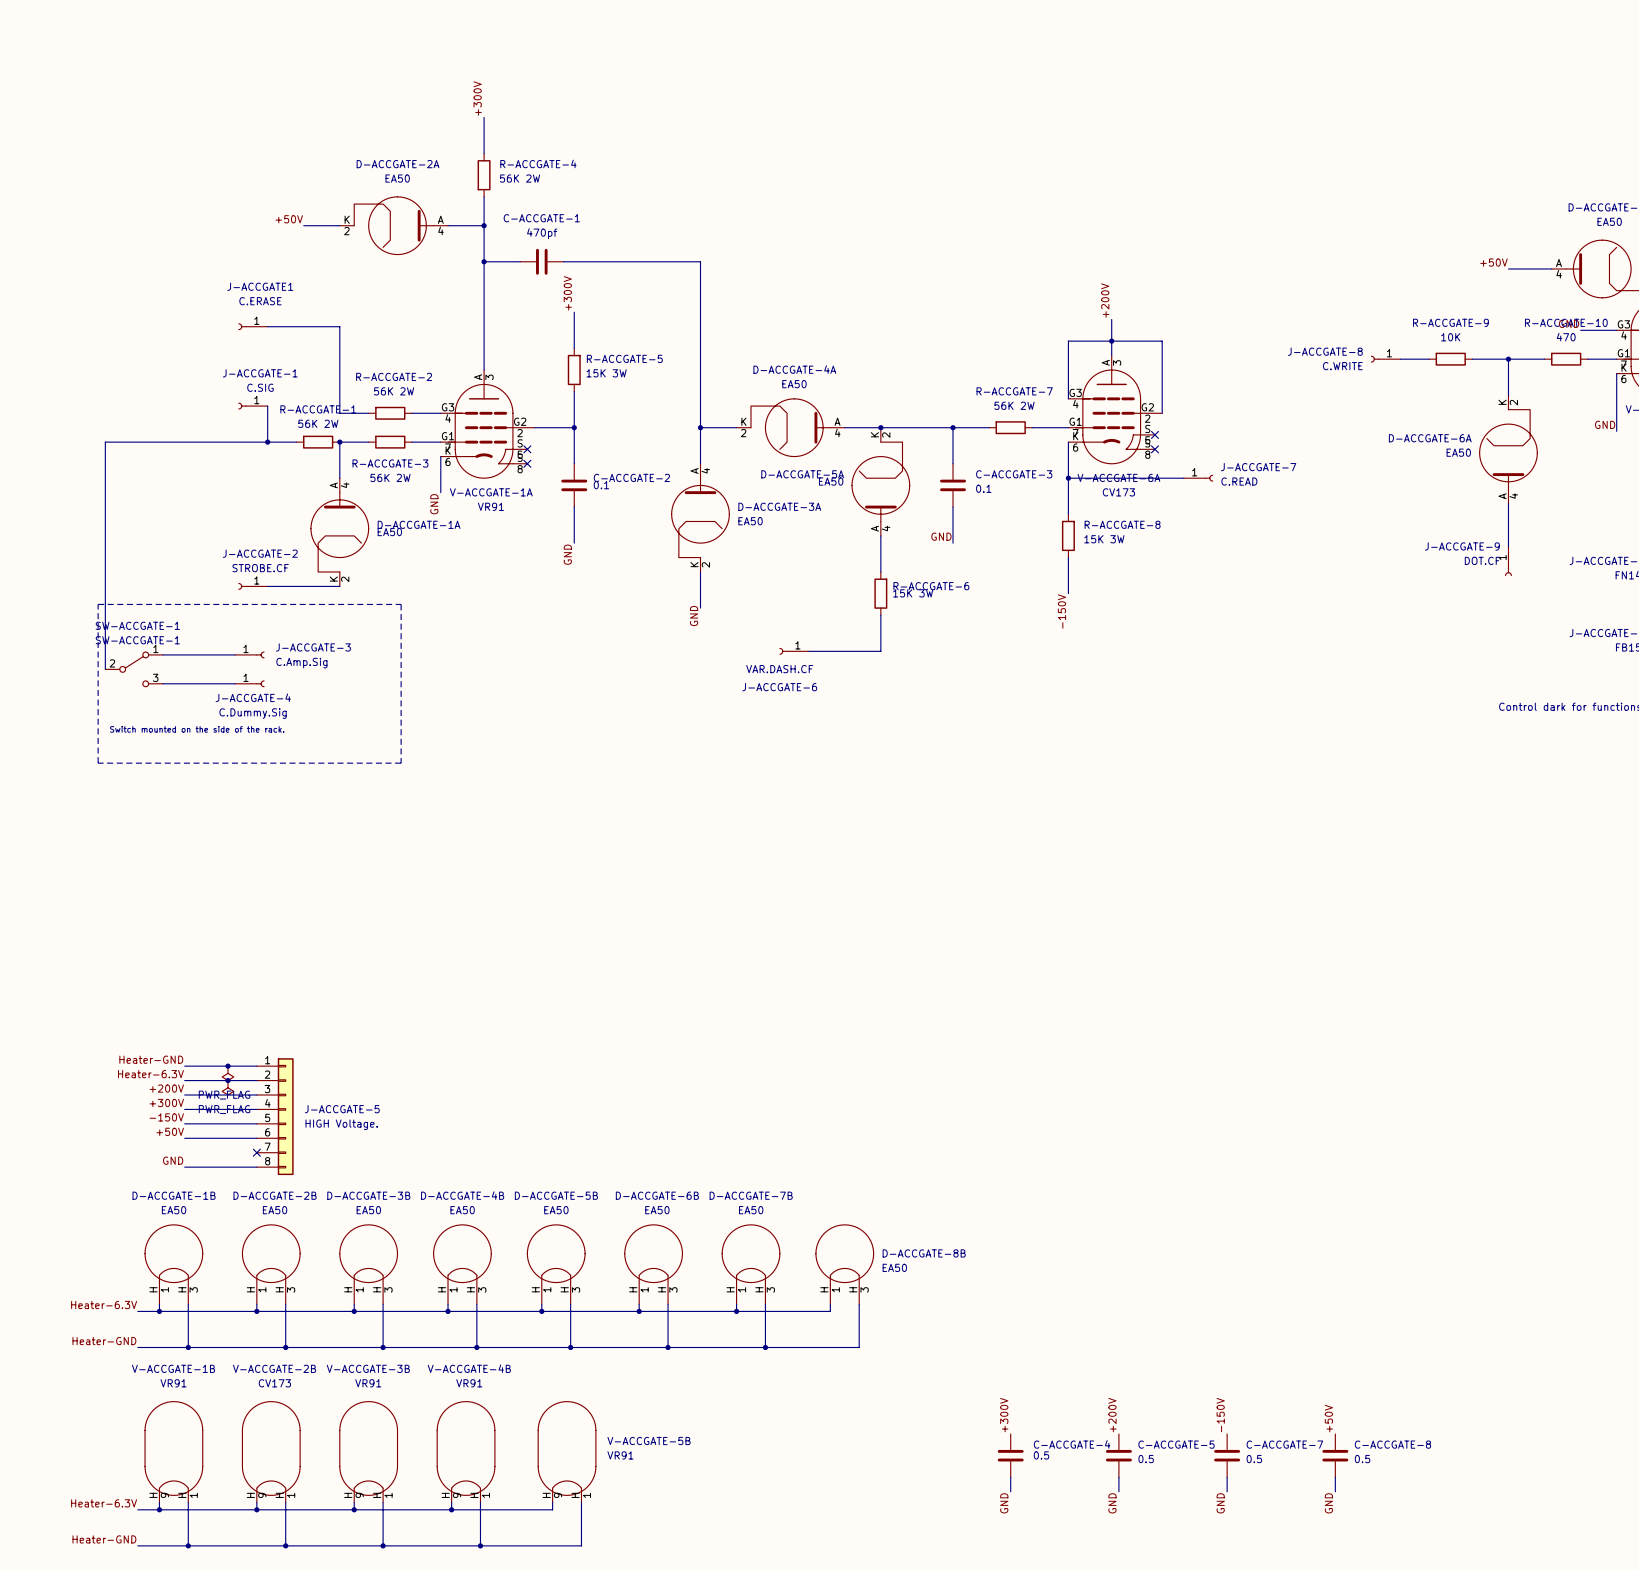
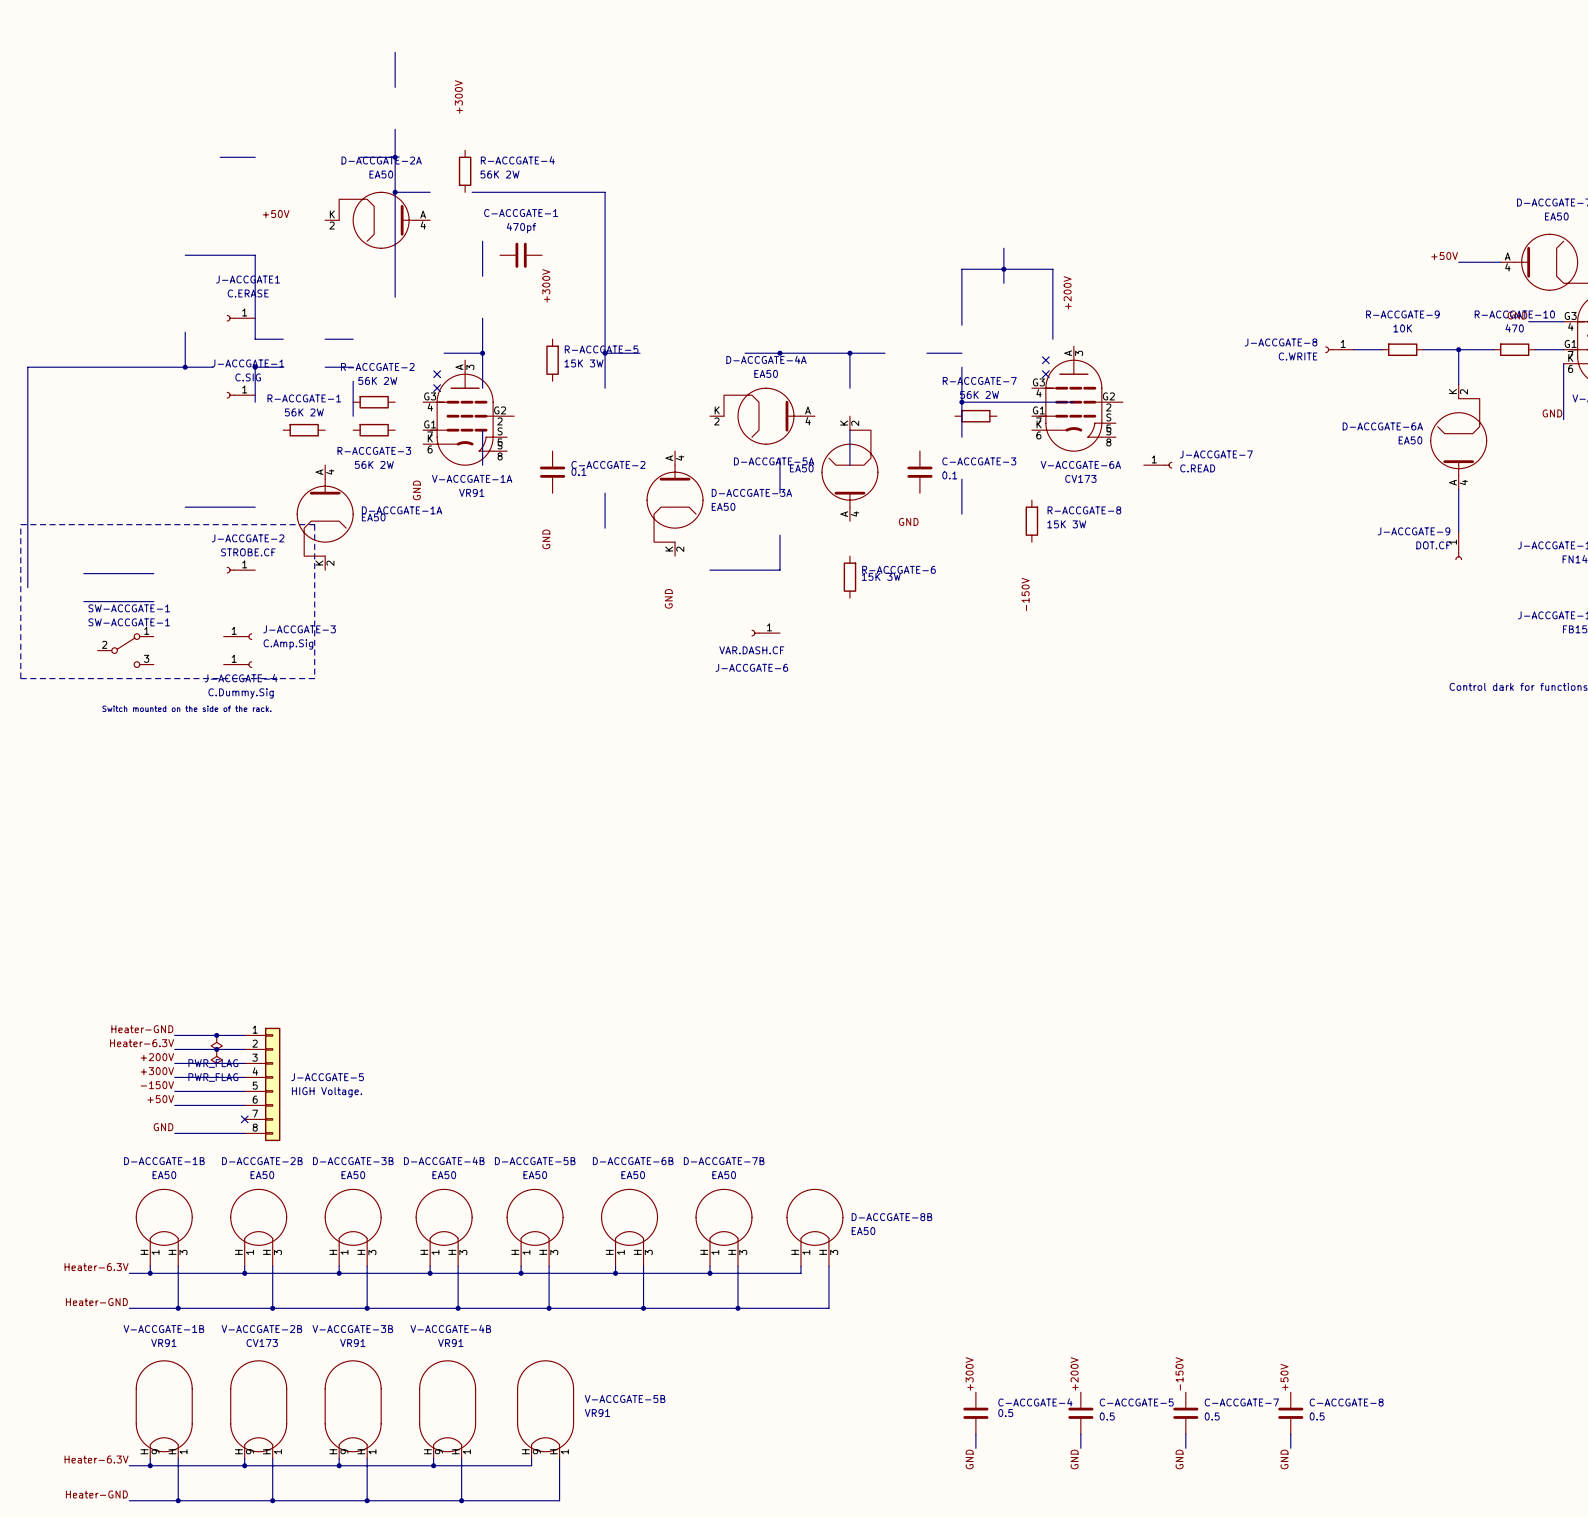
wire: (484, 117) (484, 153) -> (395, 52) (395, 87)
junction: none -> (395, 157)
junction: none -> (395, 192)
wire: (484, 196) (484, 369) -> (395, 129) (395, 297)
wire: (303, 225) (339, 225) -> (220, 157) (255, 157)
wire: (448, 225) (484, 225) -> (360, 157) (395, 157)
junction: (484, 225) -> none
wire: (484, 261) (520, 261) -> (395, 192) (430, 192)
junction: (484, 261) -> none
wire: (563, 261) (700, 261) (700, 463) -> (472, 192) (605, 192) (605, 388)
junction: none -> (1003, 269)
wire: (574, 312) (574, 348) -> (482, 241) (482, 276)
wire: (1111, 319) (1111, 355) -> (1003, 248) (1003, 283)
wire: (267, 326) (339, 326) (339, 413) (368, 413) -> (185, 255) (255, 255) (255, 339) (283, 339)
wire: none -> (185, 332) (185, 367)
junction: (1111, 341) -> none
junction: none -> (482, 353)
junction: none -> (605, 353)
junction: none -> (779, 353)
junction: none -> (849, 353)
no-connect mark: none -> (1045, 360)
junction: none -> (185, 367)
junction: none -> (255, 367)
wire: none -> (283, 367) (255, 367) (255, 395)
no-connect mark: none -> (437, 374)
no-connect mark: none -> (1045, 374)
wire: (574, 391) (574, 463) -> (482, 318) (482, 388)
no-connect mark: none -> (437, 388)
wire: (1068, 398) (1068, 341) (1162, 341) (1162, 413) -> (961, 325) (961, 269) (1052, 269) (1052, 339)
wire: (267, 413) (267, 442) -> none
wire: (411, 413) (440, 413) -> (325, 339) (353, 339)
junction: none -> (961, 402)
wire: (534, 427) (574, 427) -> (444, 353) (482, 353)
junction: (574, 427) -> none
wire: (700, 427) (736, 427) -> (605, 353) (640, 353)
junction: (700, 427) -> none
wire: (844, 427) (989, 427) -> (745, 353) (884, 353)
junction: (880, 427) -> none
wire: (952, 427) (952, 463) -> (849, 353) (849, 388)
junction: (952, 427) -> none
wire: (1032, 427) (1068, 427) -> (926, 353) (961, 353)
no-connect mark: (1154, 434) -> none
junction: (267, 442) -> none
wire: (296, 442) (105, 442) (105, 669) -> (213, 367) (27, 367) (27, 587)
junction: (339, 442) -> none
wire: (368, 442) (339, 442) (339, 478) -> none
wire: (411, 442) (440, 442) -> (325, 367) (353, 367)
wire: (1068, 442) (1068, 514) -> (961, 367) (961, 437)
no-connect mark: (527, 449) -> none
no-connect mark: (1154, 449) -> none
wire: (440, 456) (440, 492) -> (353, 381) (353, 416)
no-connect mark: (527, 463) -> none
wire: (1068, 478) (1183, 478) -> (961, 402) (1073, 402)
junction: (1068, 478) -> none
wire: (574, 507) (574, 543) -> (482, 430) (482, 465)
wire: (952, 507) (952, 543) -> (849, 430) (849, 465)
wire: (880, 535) (880, 571) -> (779, 458) (779, 493)
wire: (1068, 557) (1068, 593) -> (961, 479) (961, 514)
wire: (700, 571) (700, 608) -> (605, 493) (605, 528)
wire: (267, 586) (339, 586) -> (185, 507) (255, 507)
line: (98, 604) (98, 763) (401, 763) (401, 604) (98, 604) -> (20, 524) (20, 678) (314, 678) (314, 524) (20, 524)
wire: (880, 615) (880, 651) (808, 651) -> (779, 535) (779, 570) (710, 570)
wire: (163, 654) (235, 654) -> (83, 573) (153, 573)
wire: (163, 683) (235, 683) -> (83, 601) (153, 601)

